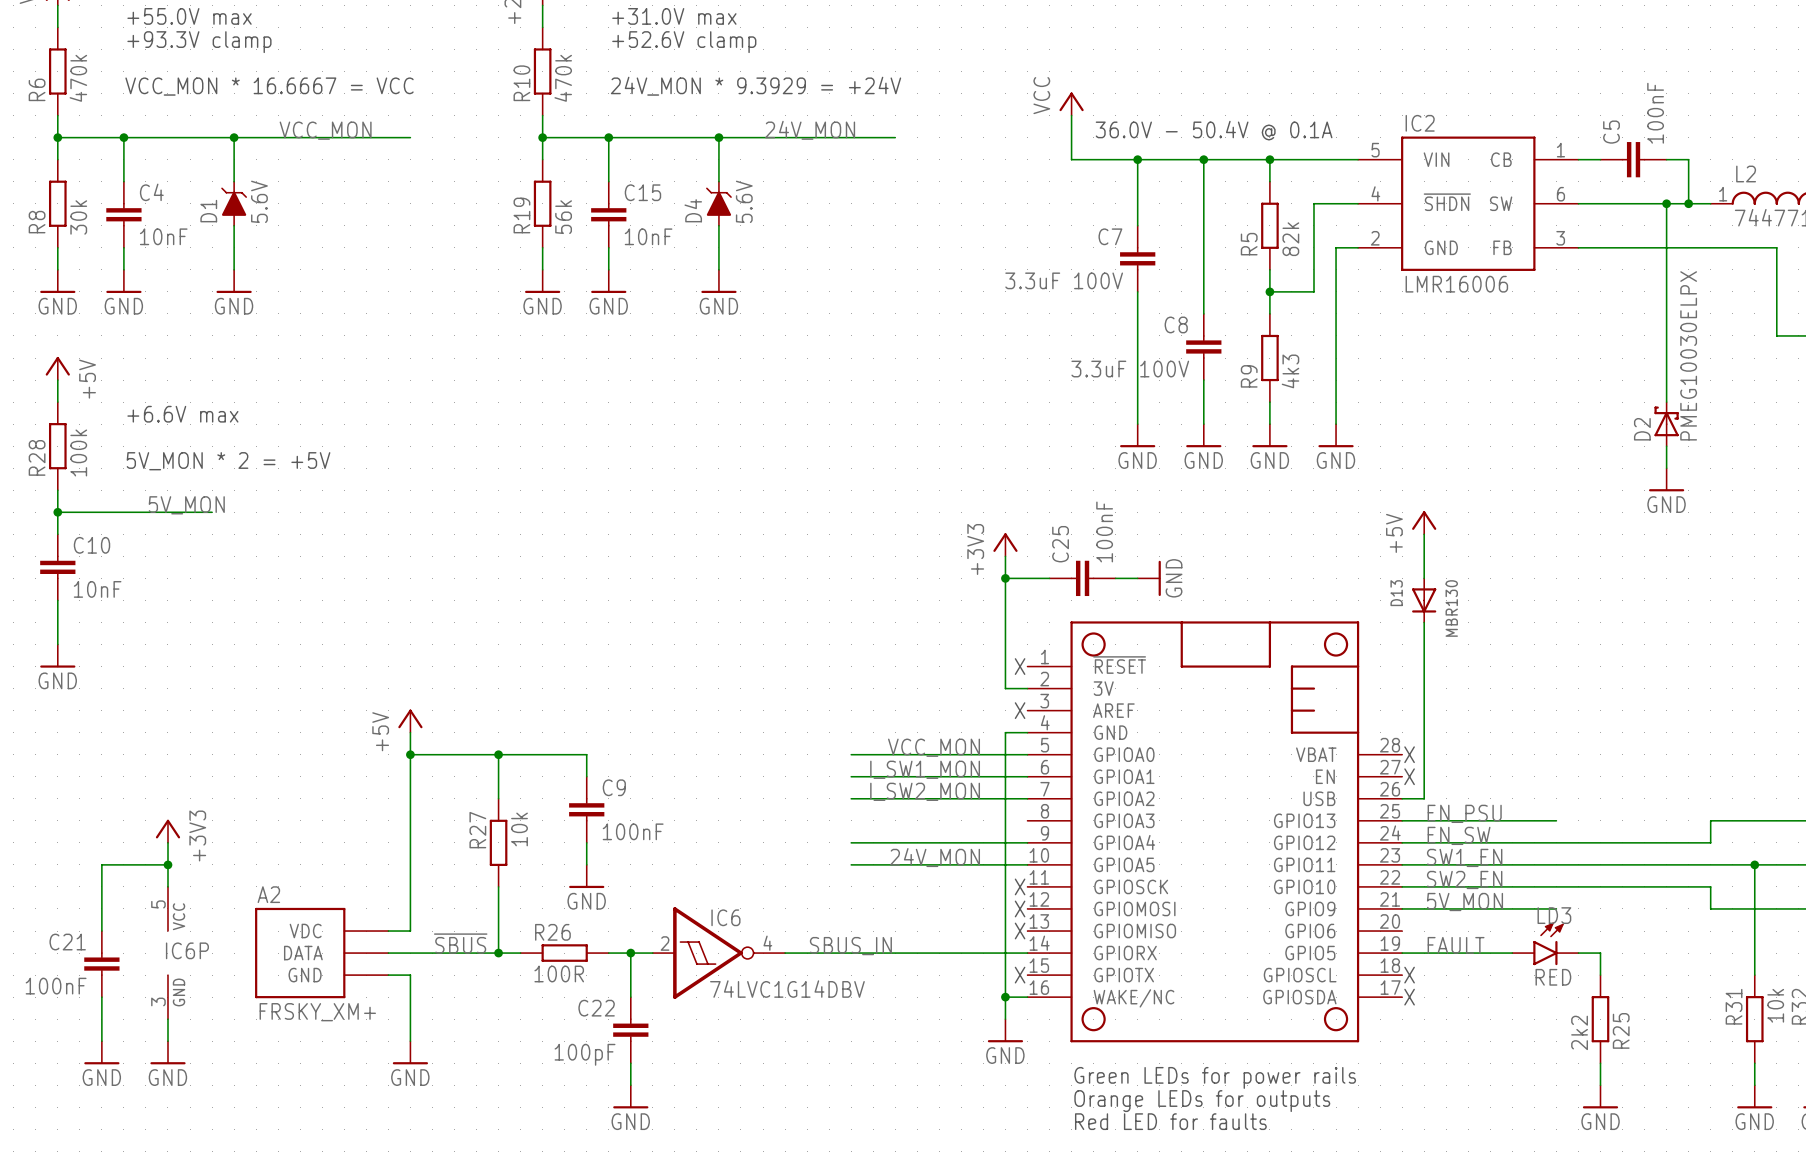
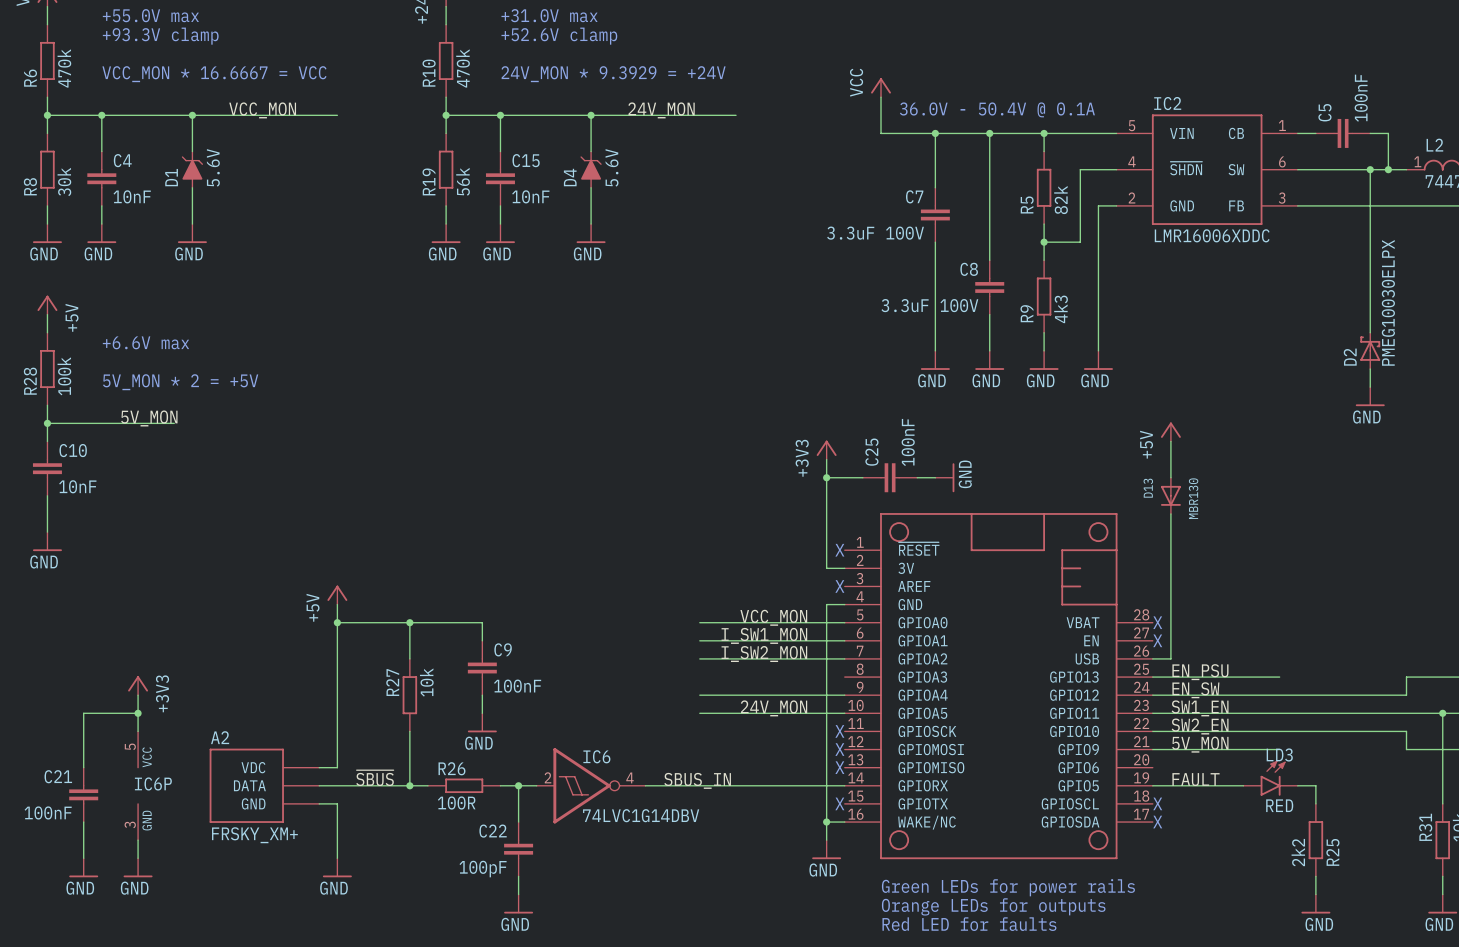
IC2 value: LMR16006 (1456, 284) -> LMR16006XDDC (1212, 235)

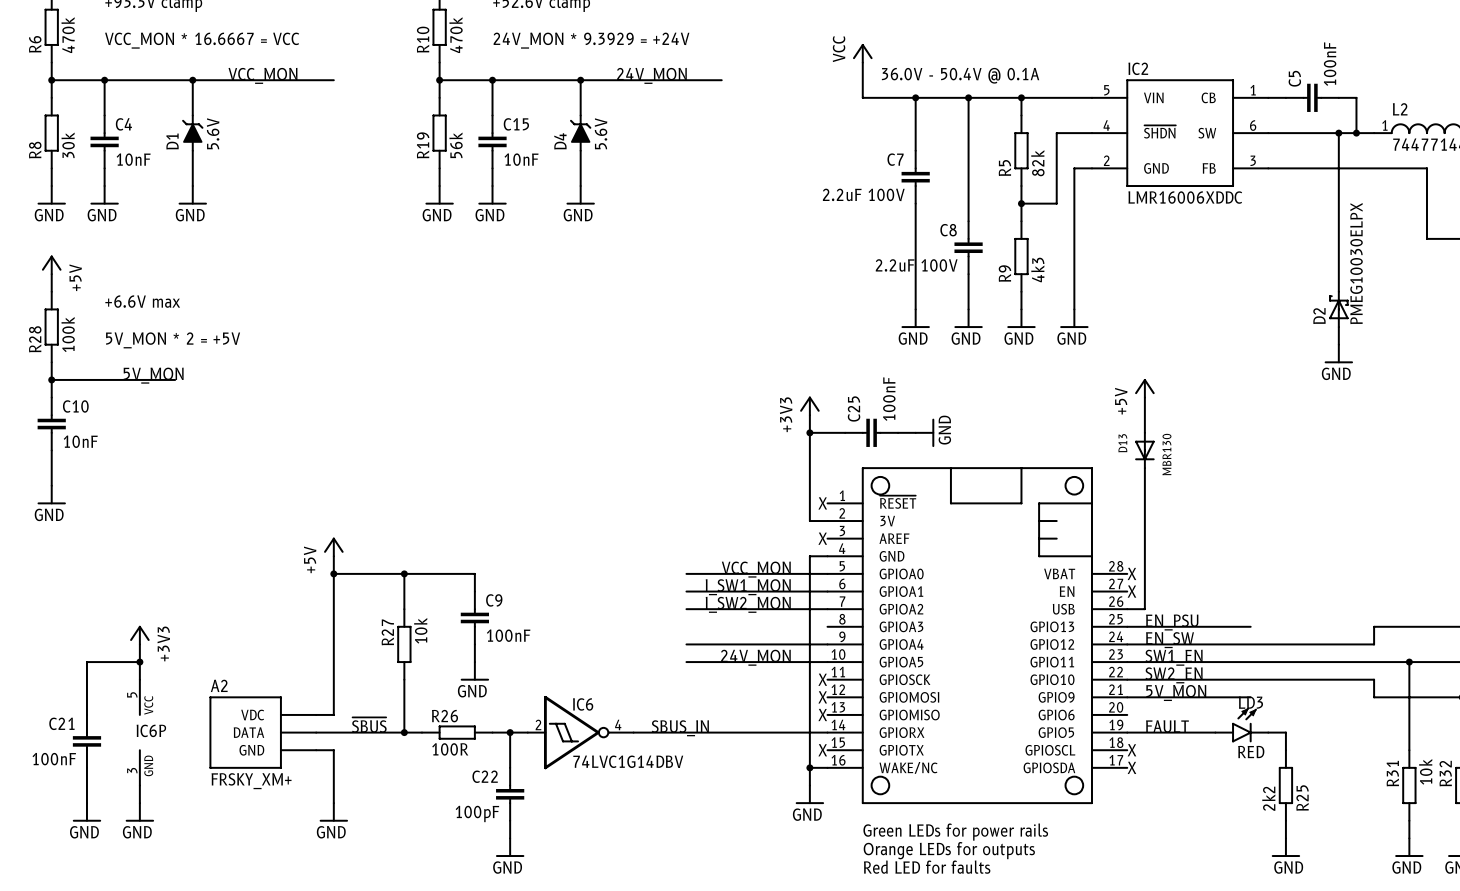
C7 value: 3.3uF 100V (875, 233) -> 2.2uF 100V (863, 194)
C8 value: 3.3uF 100V (929, 305) -> 2.2uF 100V (916, 265)

